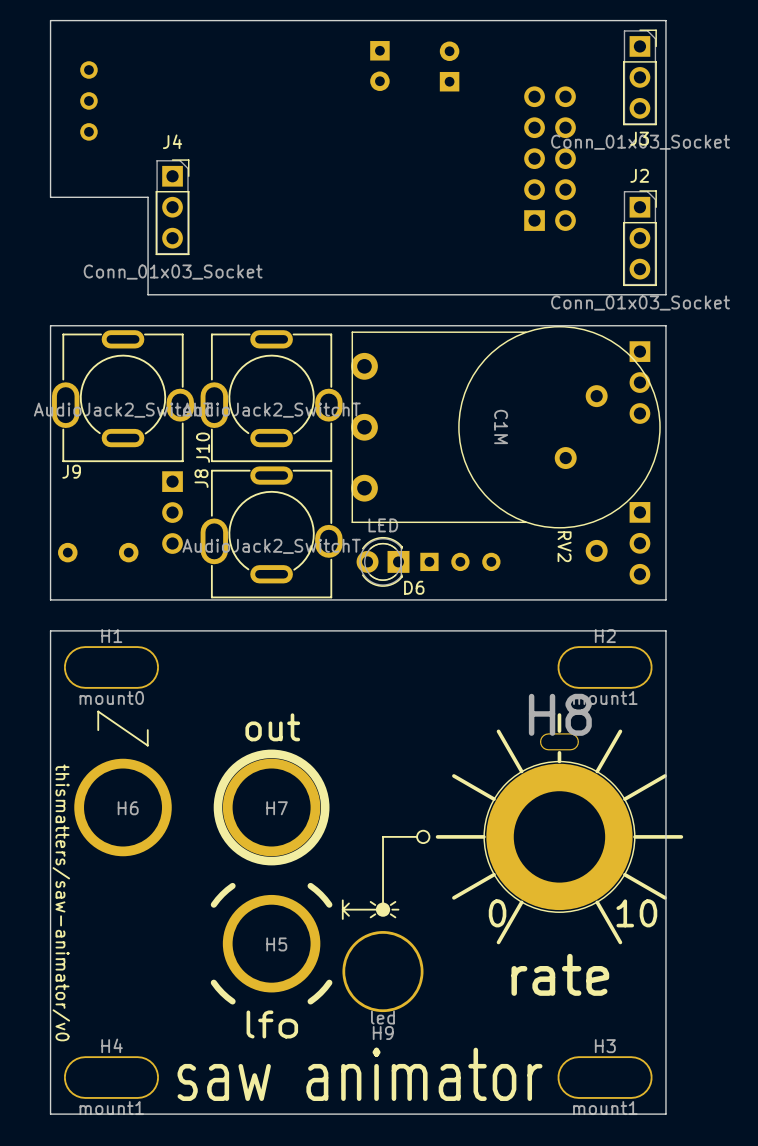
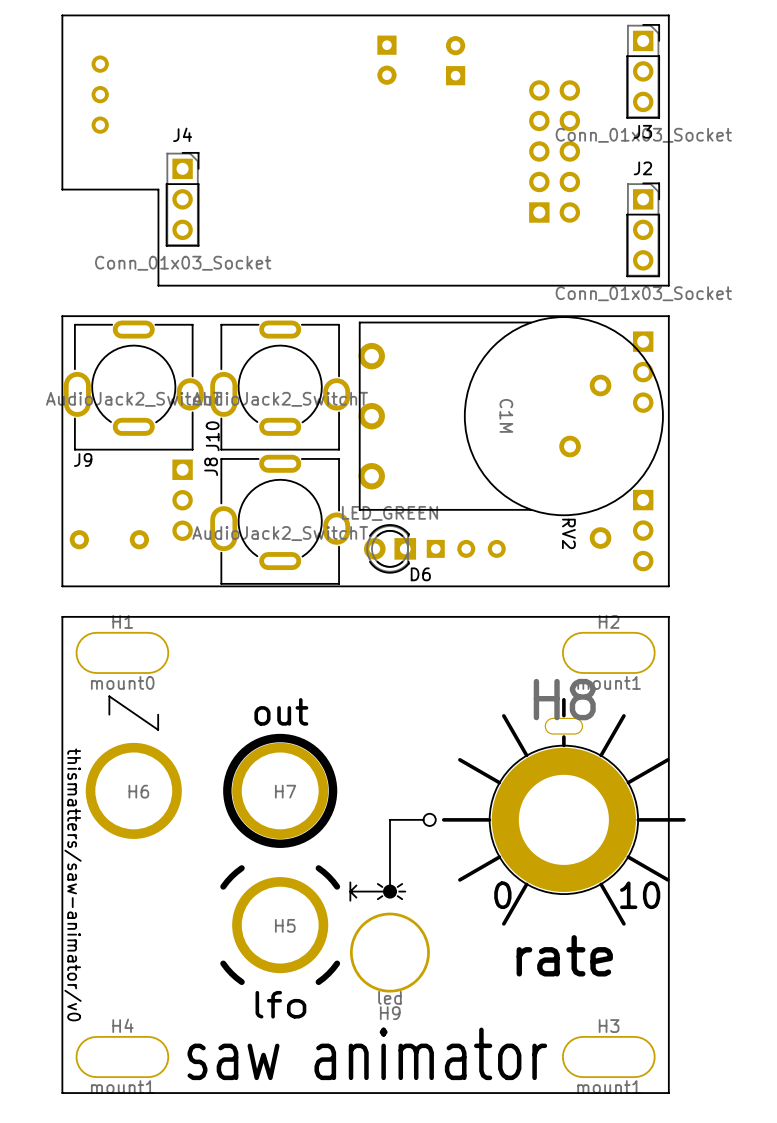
D6 value: LED (383, 525) -> LED_GREEN (390, 513)

